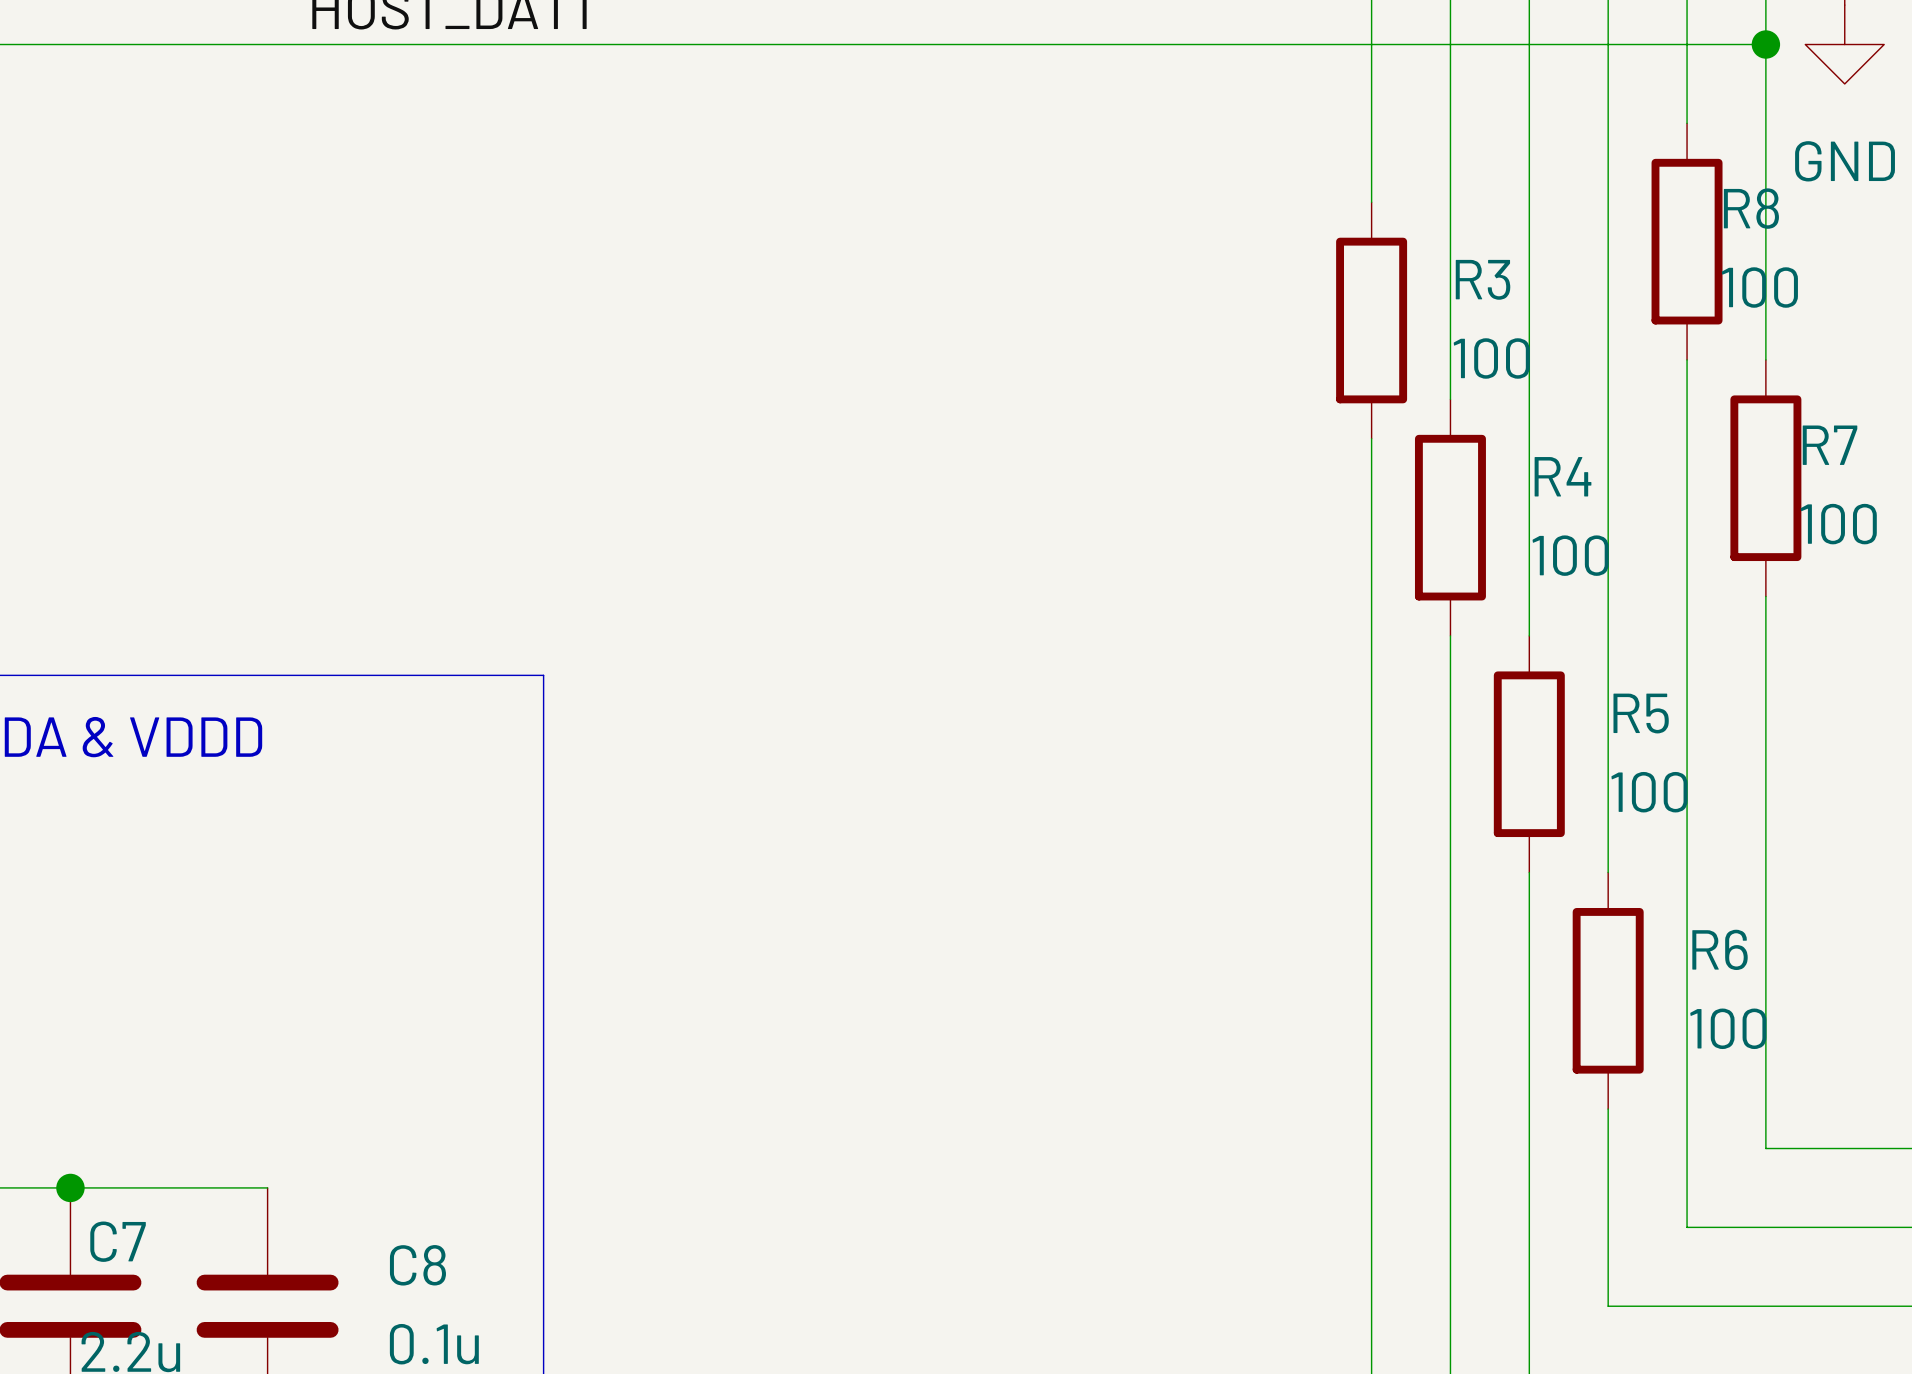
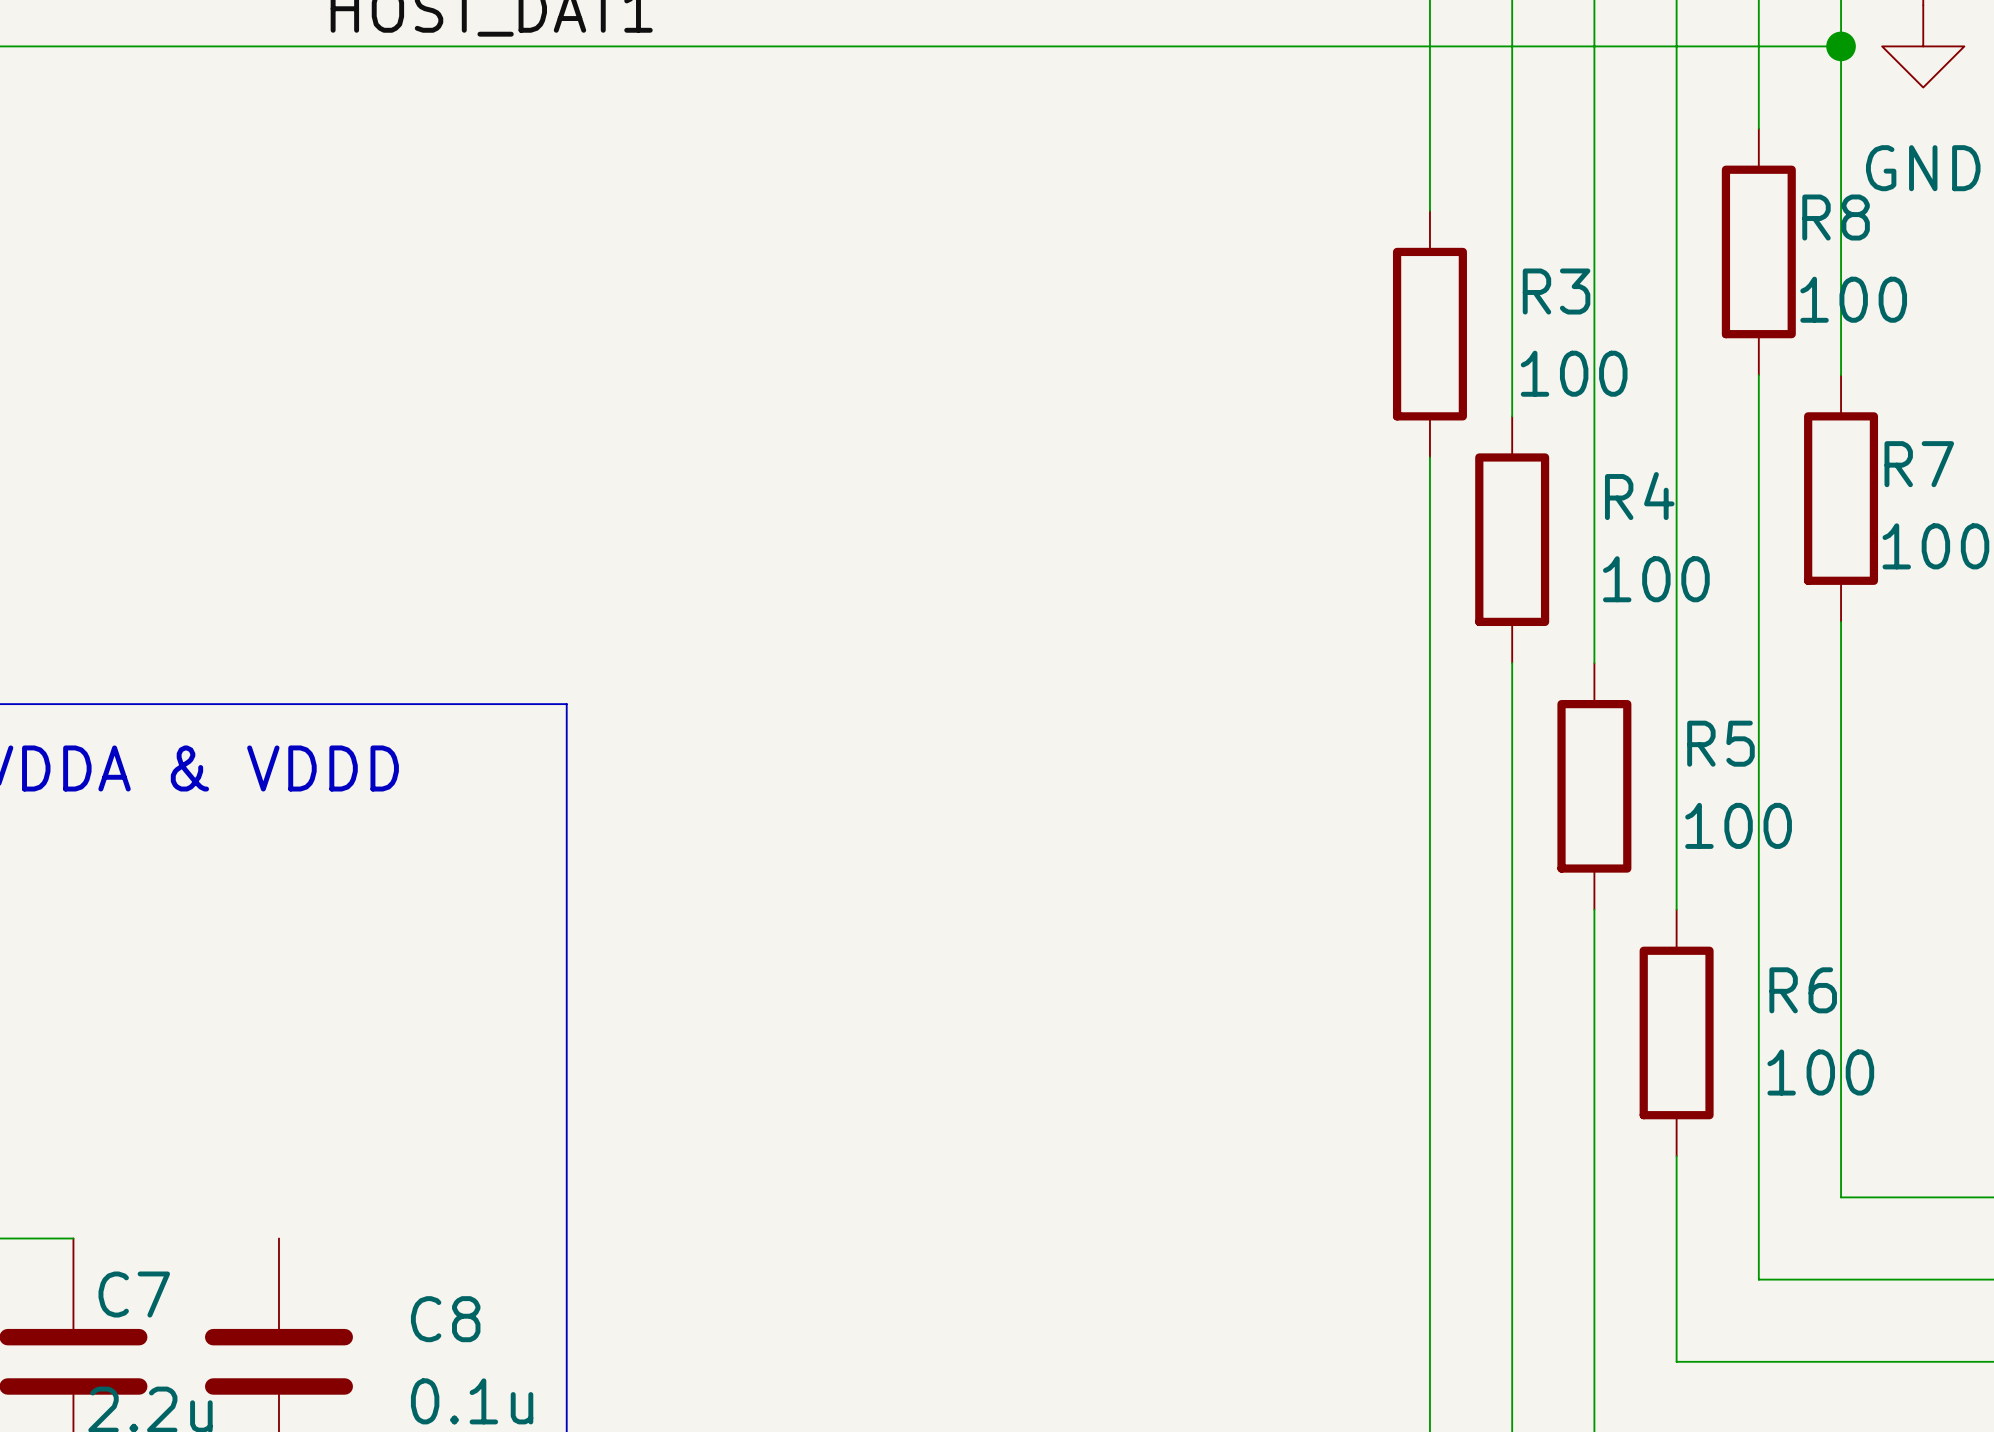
wire: (70, 1187) (267, 1187) -> none
junction: (70, 1187) -> none

